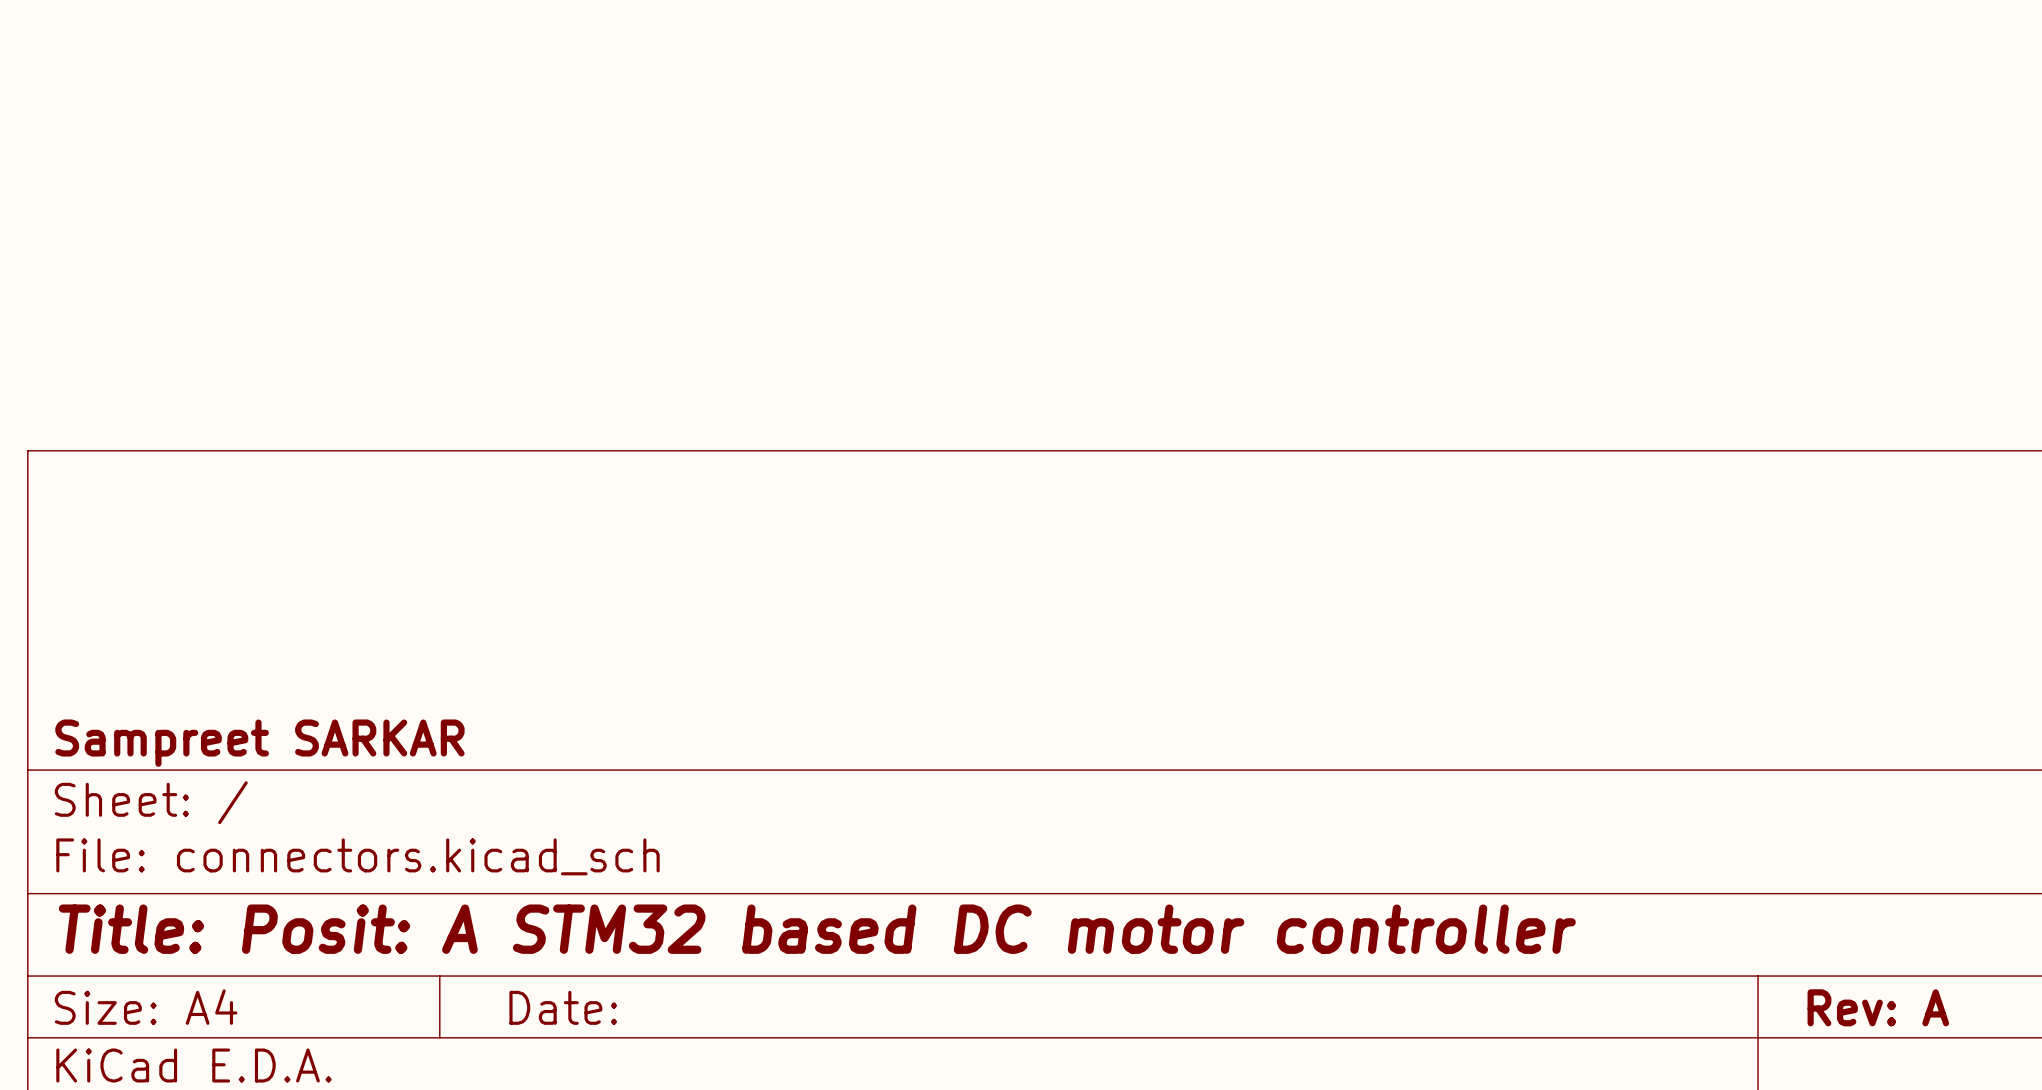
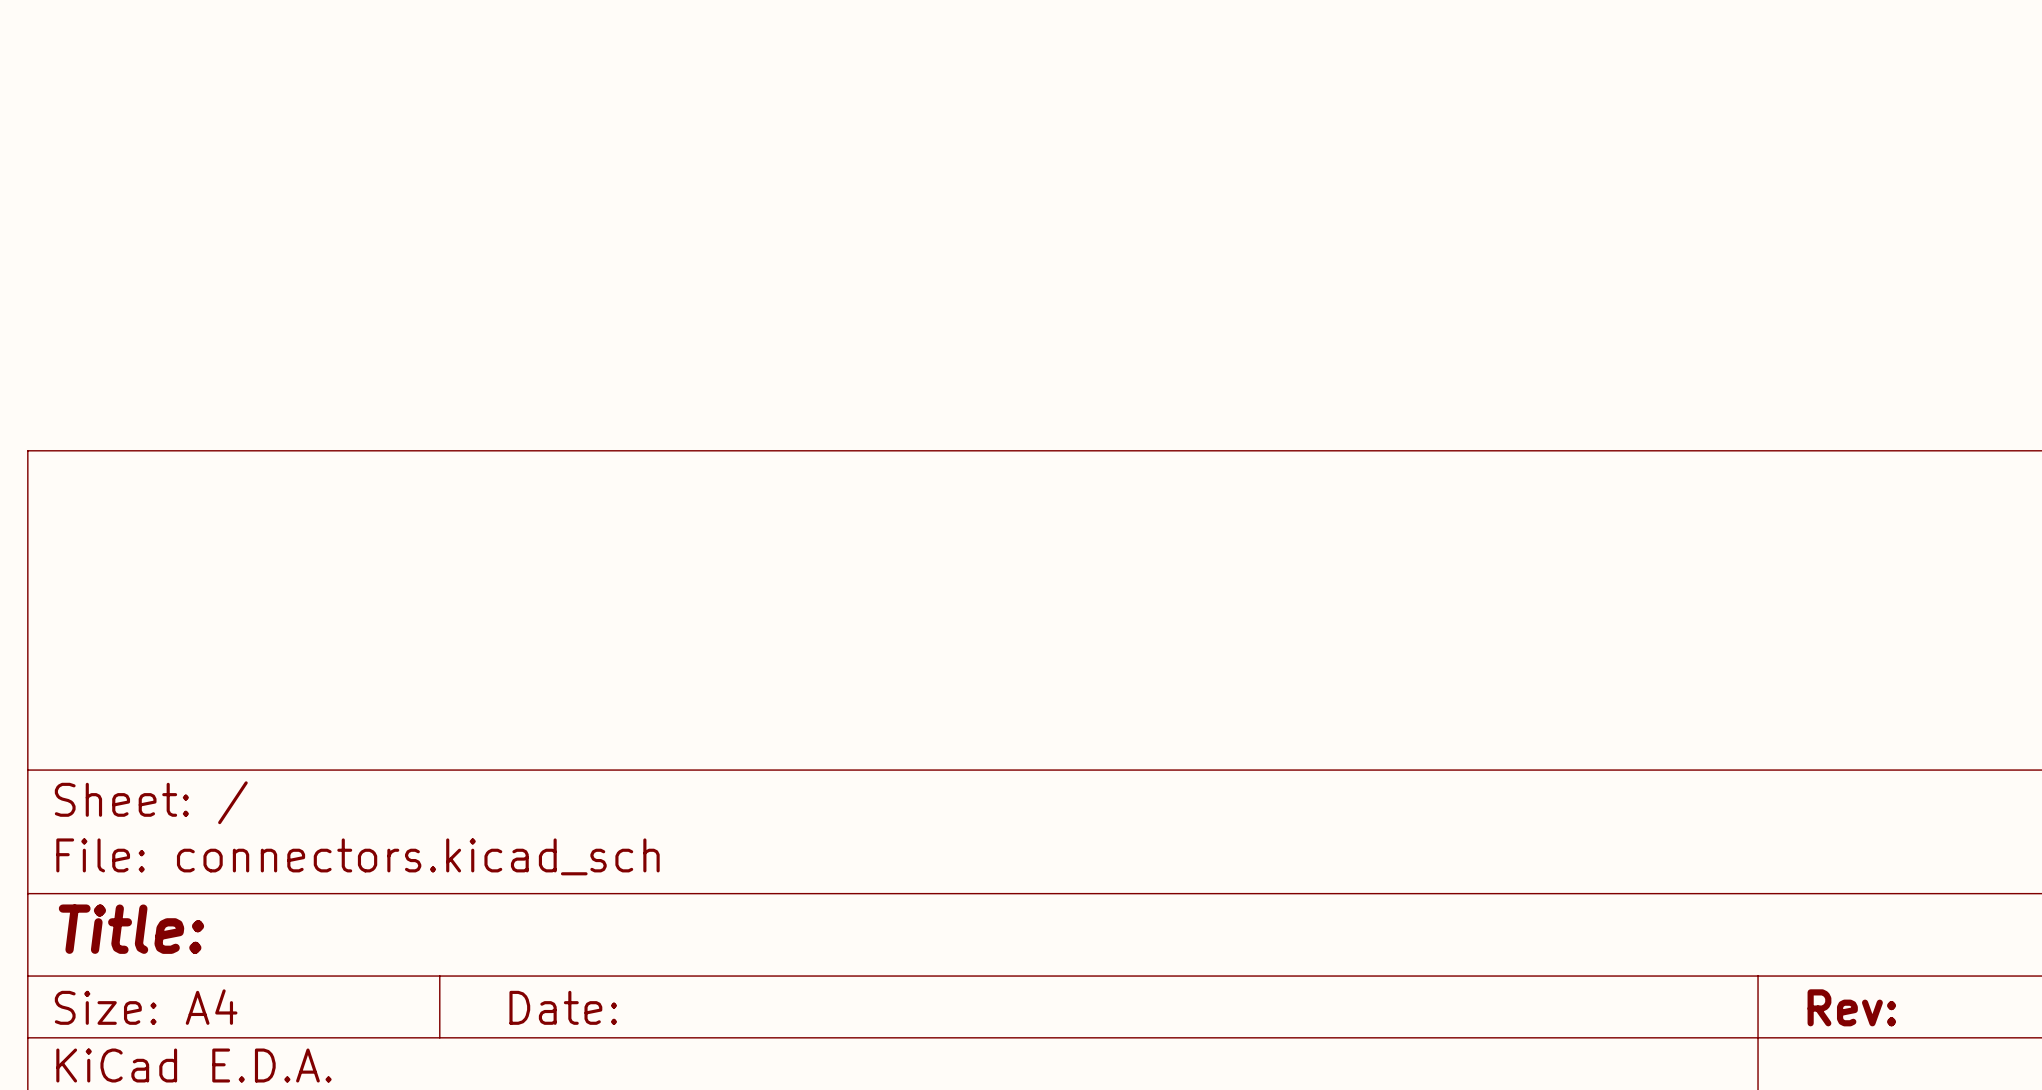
title block: Sampreet SARKAR (259, 743) -> none
title block: Title: Posit: A STM32 based DC motor controller (817, 929) -> Title: (131, 929)
title block: Rev: A (1878, 1007) -> Rev: (1851, 1007)

